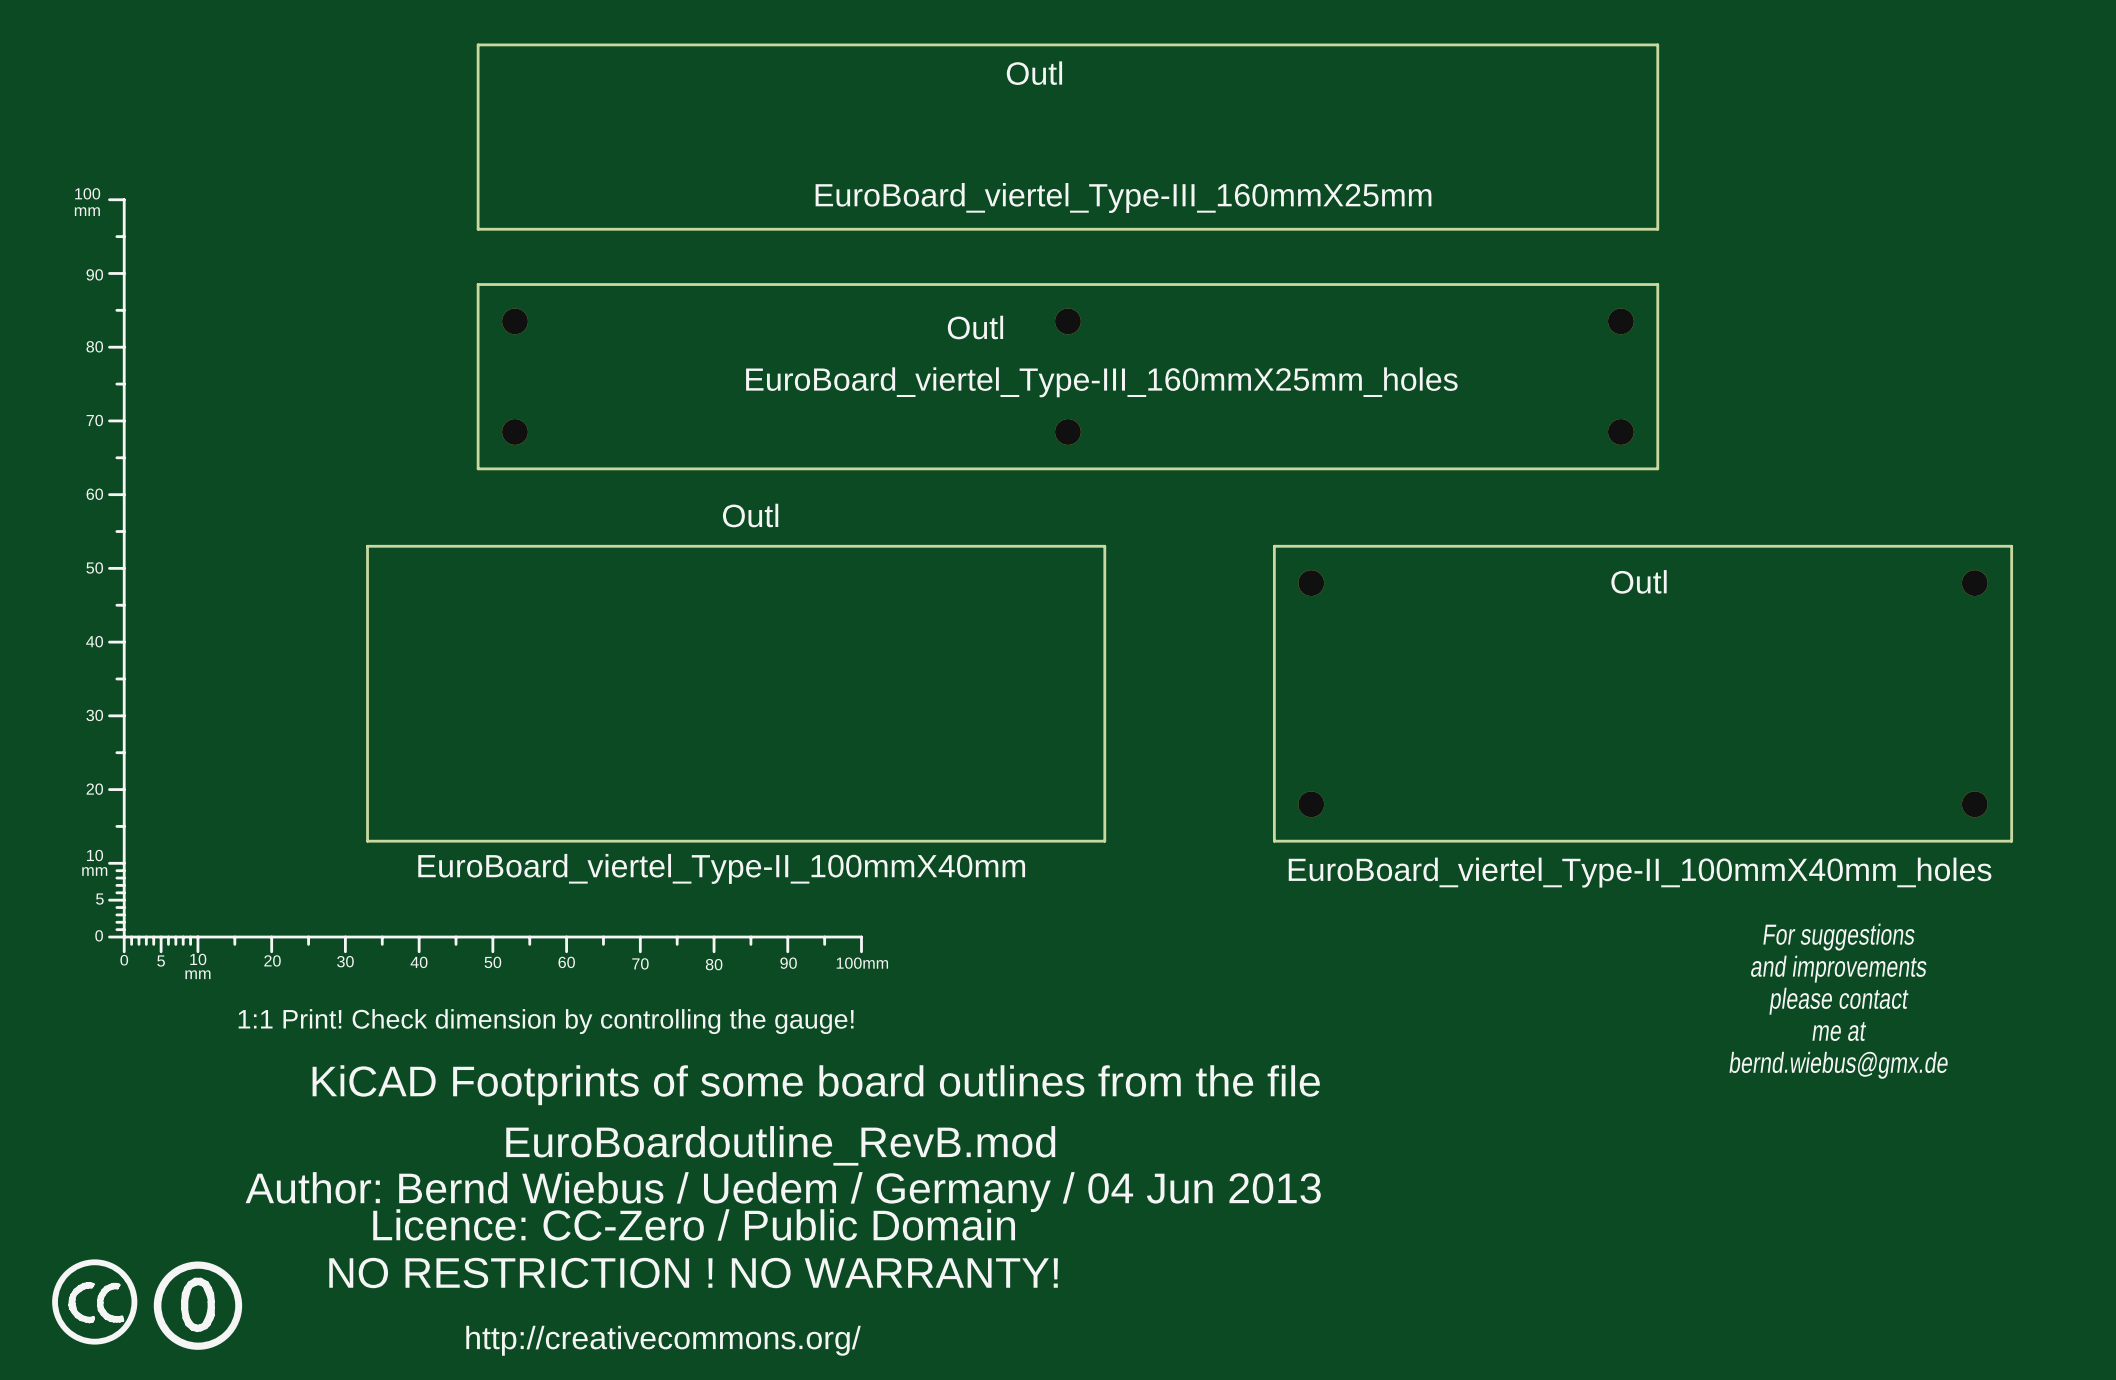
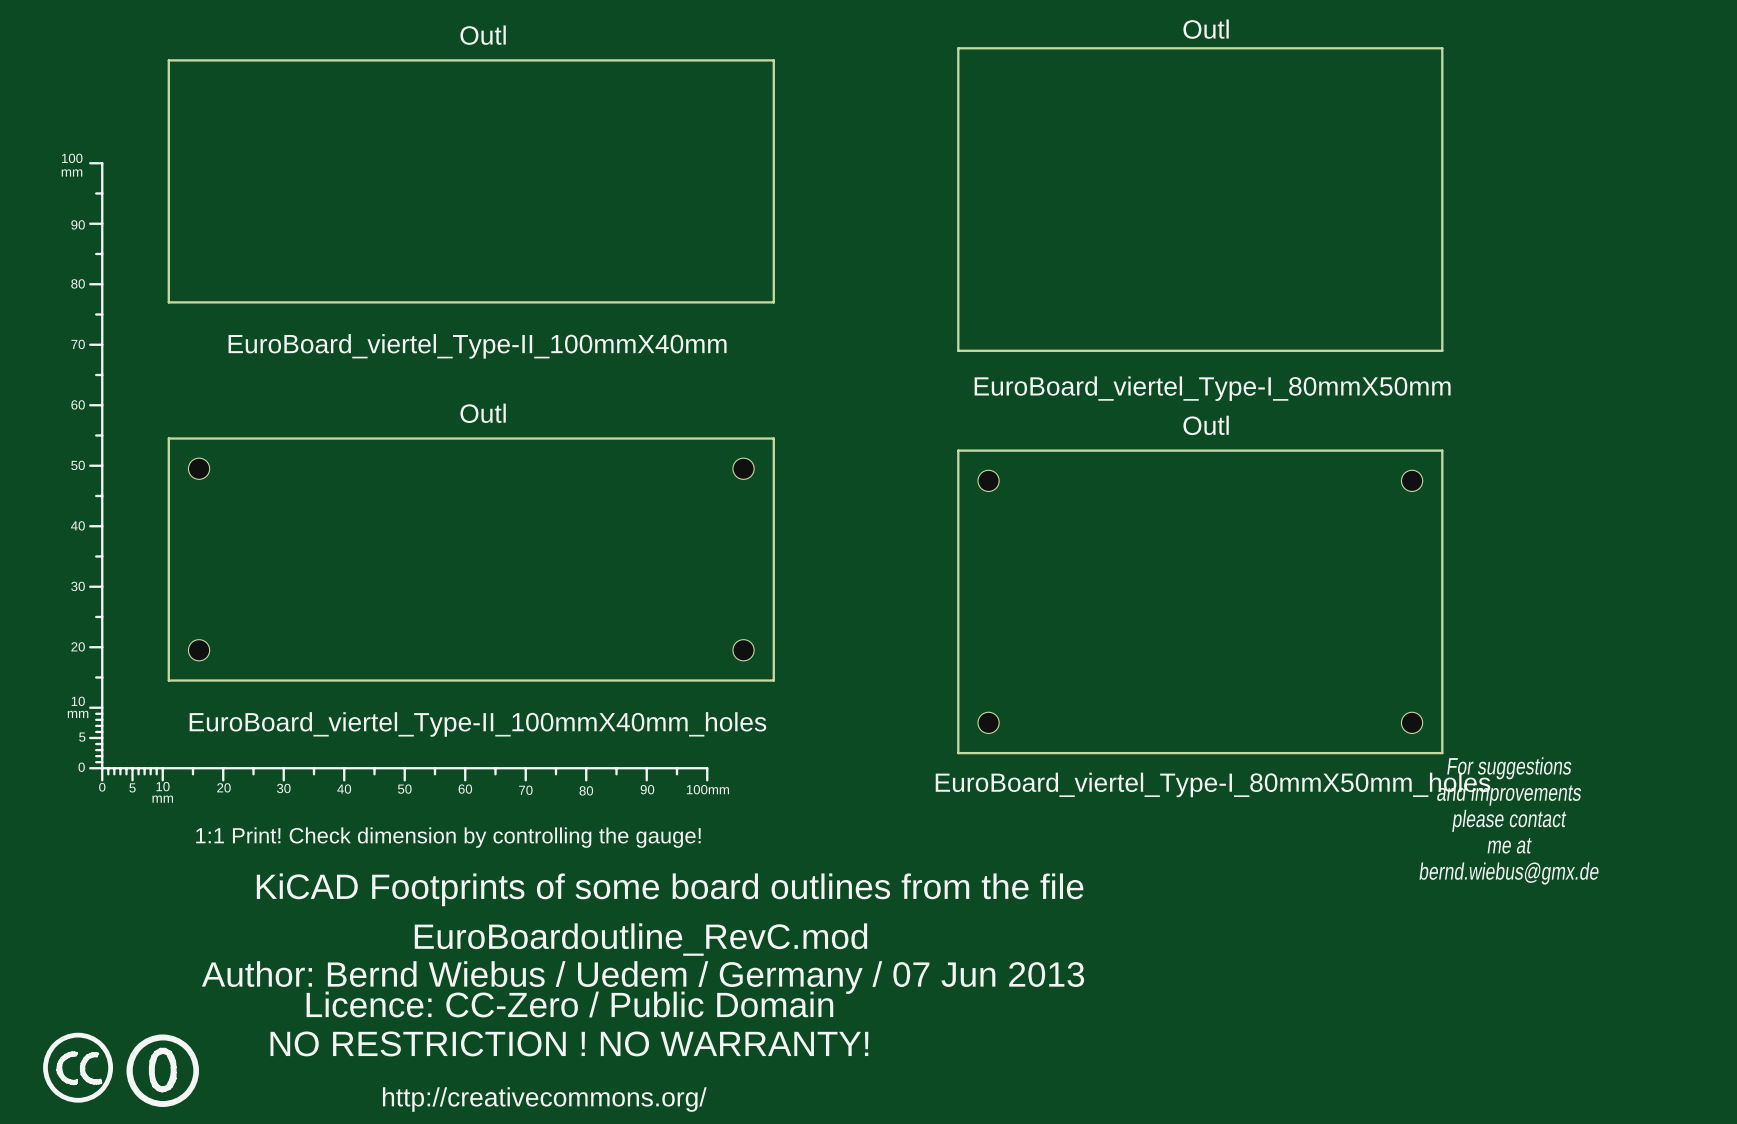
Outl: EuroBoard_viertel_Type-III_160mmX25mm (1067, 137) -> none
Outl: none -> EuroBoard_viertel_Type-II_100mmX40mm (471, 181)
Outl: none -> EuroBoard_viertel_Type-I_80mmX50mm (1200, 199)
Outl: EuroBoard_viertel_Type-III_160mmX25mm_holes (1067, 376) -> none
Outl: none -> EuroBoard_viertel_Type-II_100mmX40mm_holes (471, 559)
Outl: EuroBoard_viertel_Type-II_100mmX40mm (736, 693) -> none
Outl: EuroBoard_viertel_Type-II_100mmX40mm_holes (1643, 693) -> none
Outl: none -> EuroBoard_viertel_Type-I_80mmX50mm_holes (1200, 601)
text: EuroBoardoutline_RevB.mod (780, 1145) -> EuroBoardoutline_RevC.mod (641, 939)
text: Author: Bernd Wiebus / Uedem / Germany / 04 Jun 2013 (783, 1192) -> Author: Bernd Wiebus / Uedem / Germany / 07 Jun 2013 (642, 977)

